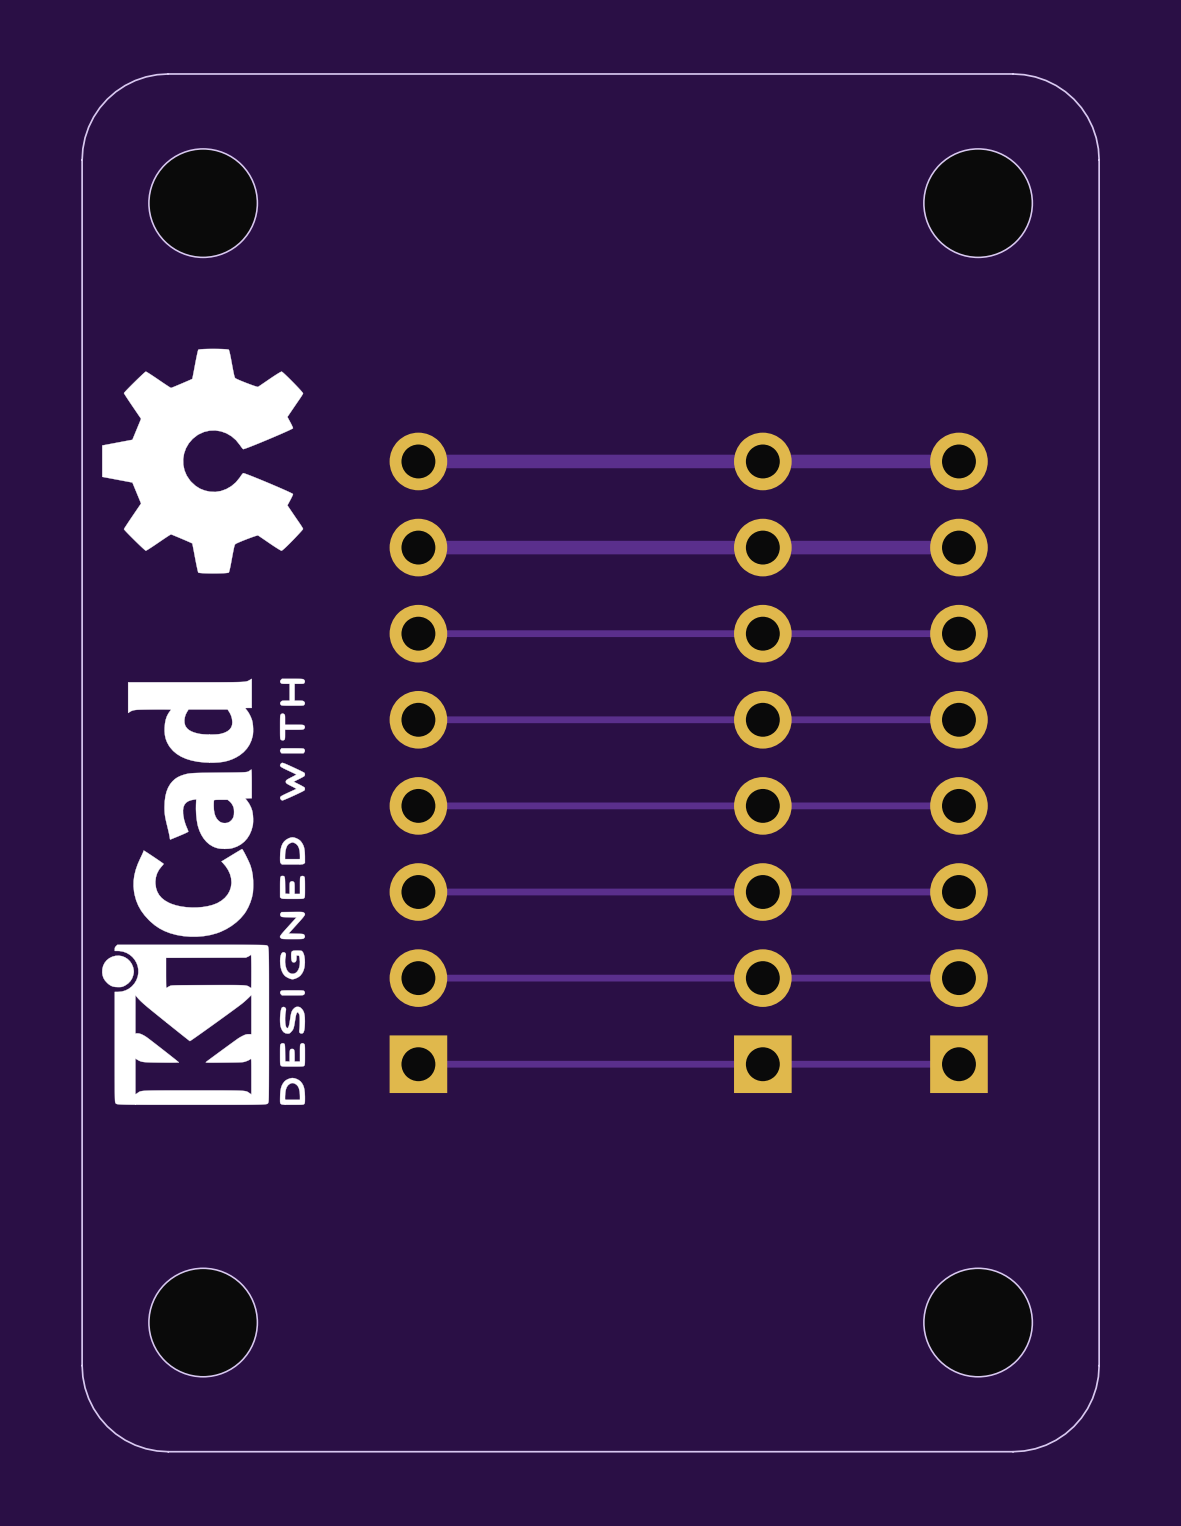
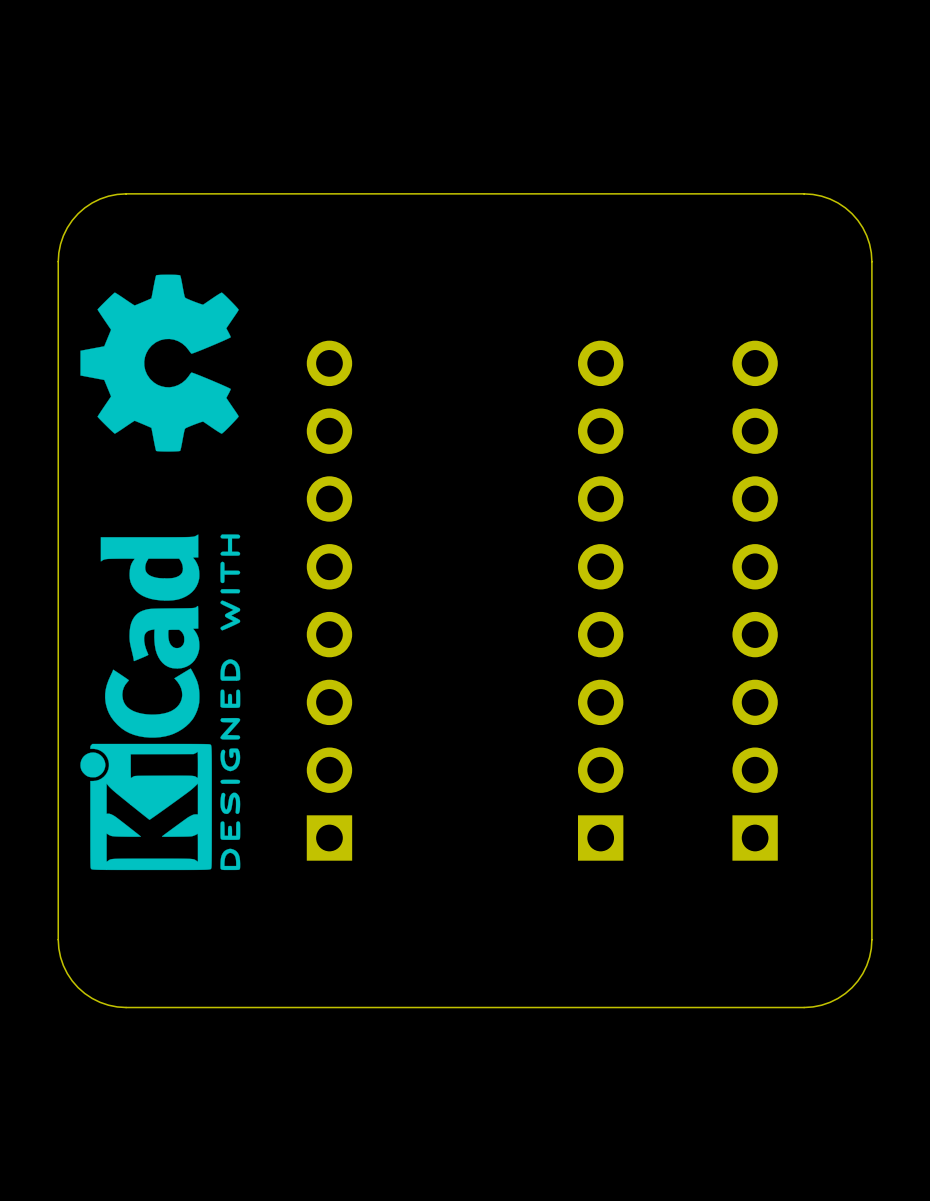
board edge: (1013, 73) (168, 73) (145, 76) (125, 85) (107, 99) (93, 117) (85, 137) (82, 160) (82, 1365) (85, 1387) (93, 1408) (107, 1426) (125, 1440) (145, 1448) (168, 1451) (1013, 1451) (1035, 1448) (1056, 1440) (1073, 1426) (1087, 1408) (1096, 1387) (1099, 1365) (1099, 160) (1092, 127) (1073, 99) (1045, 80) (1013, 73) -> (804, 193) (830, 199) (852, 213) (866, 235) (871, 261) (871, 939) (866, 965) (852, 987) (830, 1002) (804, 1007) (126, 1007) (100, 1002) (78, 987) (63, 965) (58, 939) (58, 261) (63, 235) (78, 213) (100, 199) (126, 193) (804, 193)
part: (203, 203) -> none
part: (978, 203) -> none
track: (958, 461) (418, 461) -> none
track: (958, 547) (418, 547) -> none
track: (958, 633) (418, 633) -> none
track: (958, 719) (418, 719) -> none
track: (958, 805) (418, 805) -> none
track: (958, 892) (418, 892) -> none
track: (958, 978) (418, 978) -> none
track: (958, 1064) (418, 1064) -> none
part: (203, 1322) -> none
part: (978, 1322) -> none

